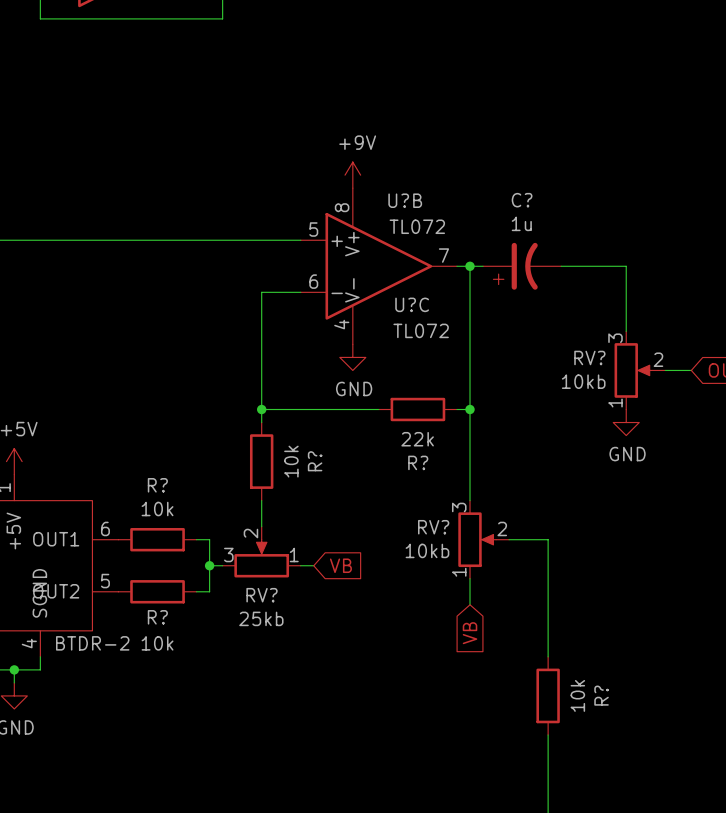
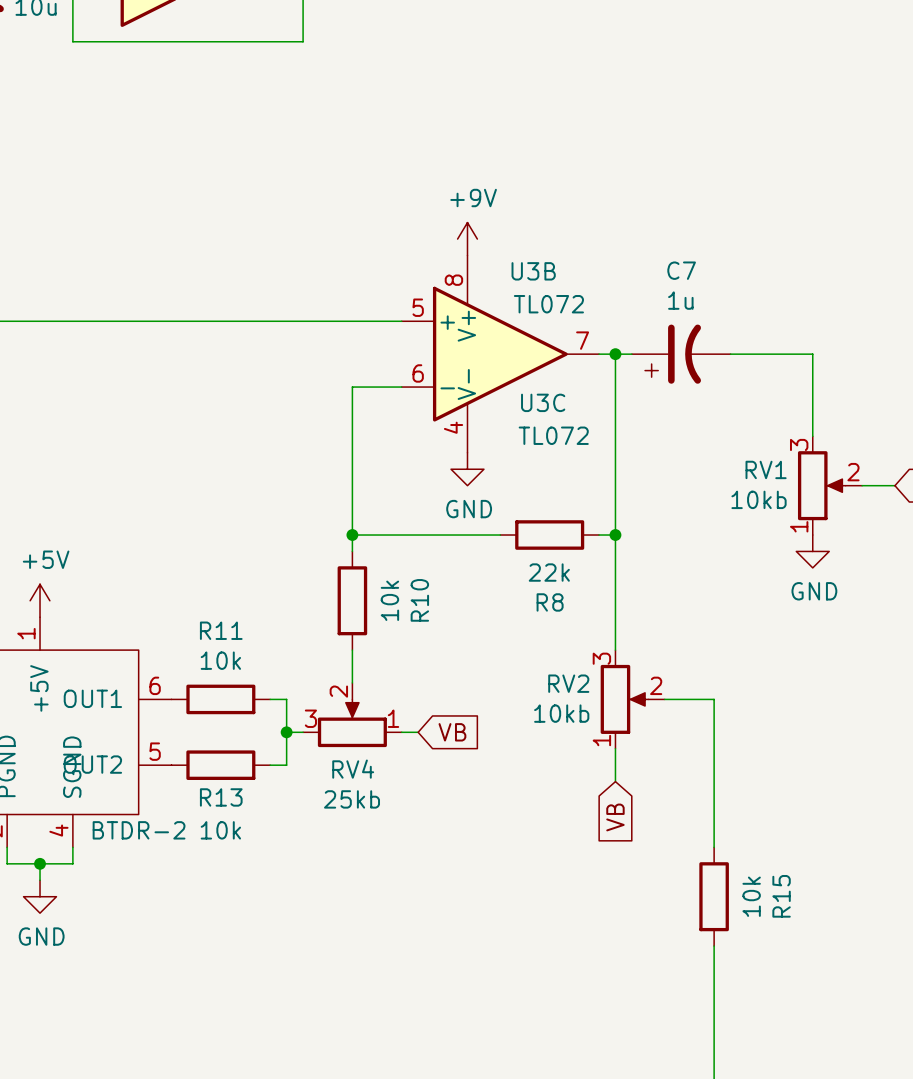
U?B name: U?B (405, 200) -> U3B (533, 271)
C? name: C? (522, 200) -> C7 (681, 270)
U?C name: U?C (412, 304) -> U3C (543, 402)
RV? name: RV? (589, 357) -> RV1 (766, 469)
R? name: R? (315, 461) -> R10 (419, 600)
R? name: R? (418, 462) -> R8 (550, 602)
R? name: R? (157, 485) -> R11 (221, 630)
RV? name: RV? (433, 527) -> RV2 (568, 683)
RV? name: RV? (262, 595) -> RV4 (353, 769)
R? name: R? (157, 617) -> R13 (221, 797)
R? name: R? (601, 695) -> R15 (781, 896)

